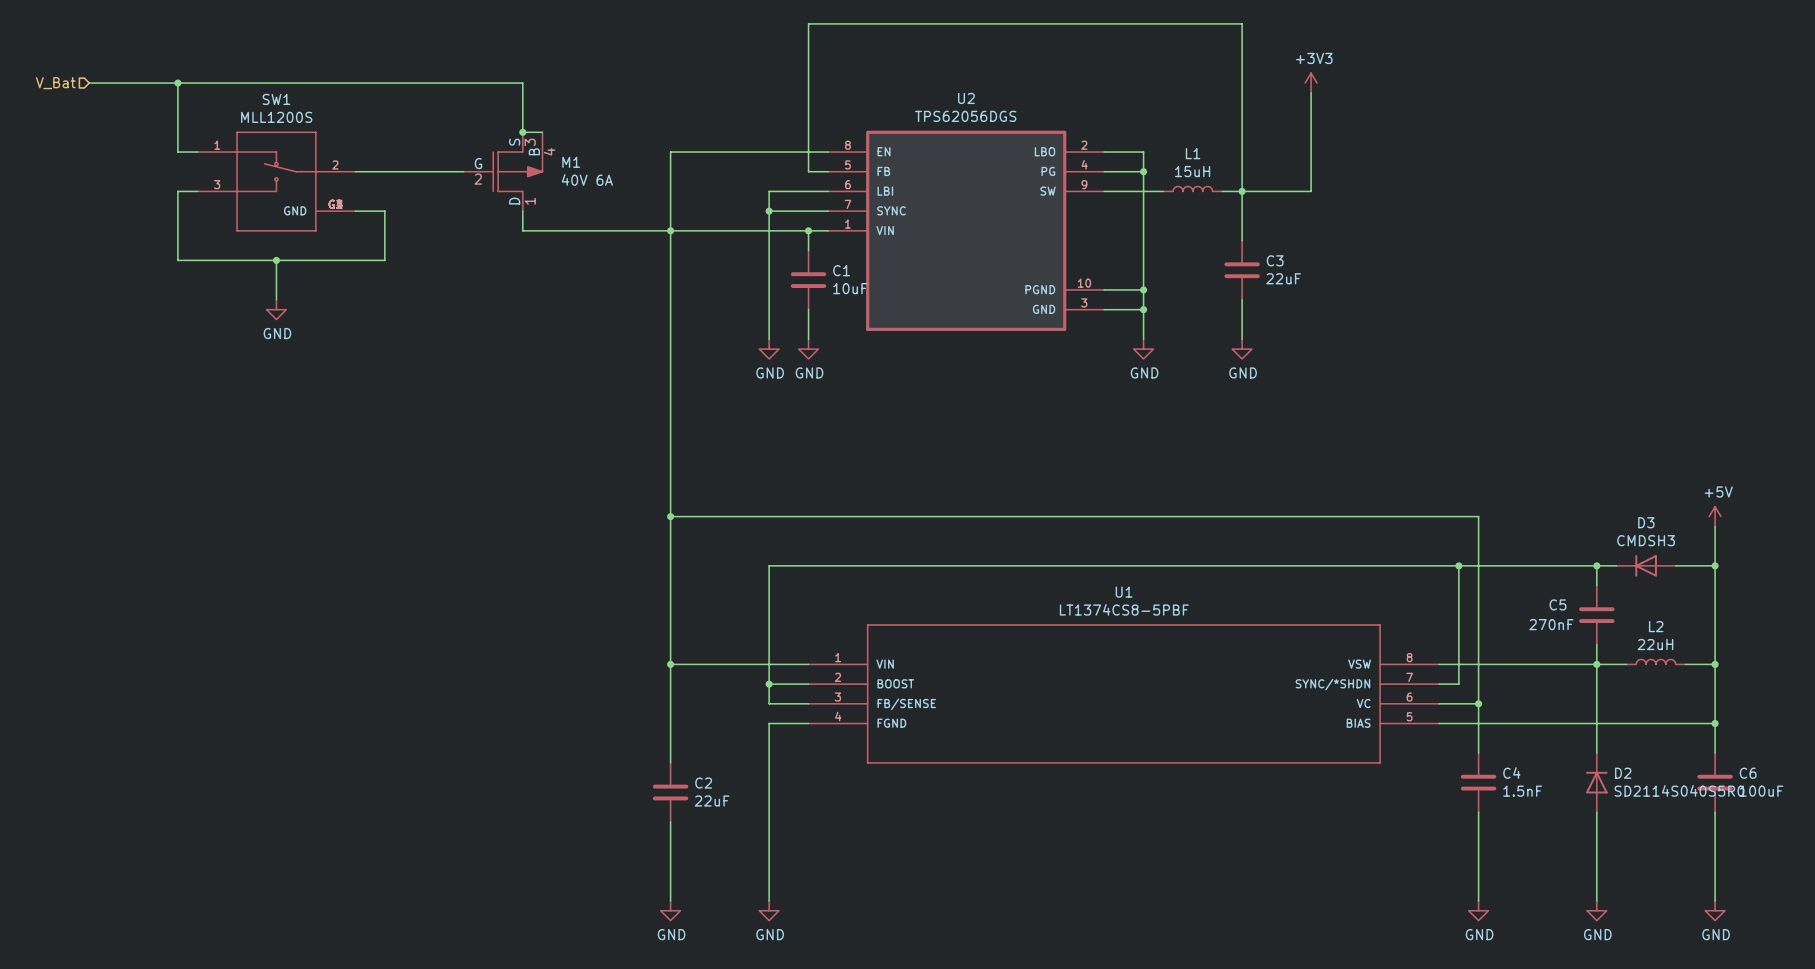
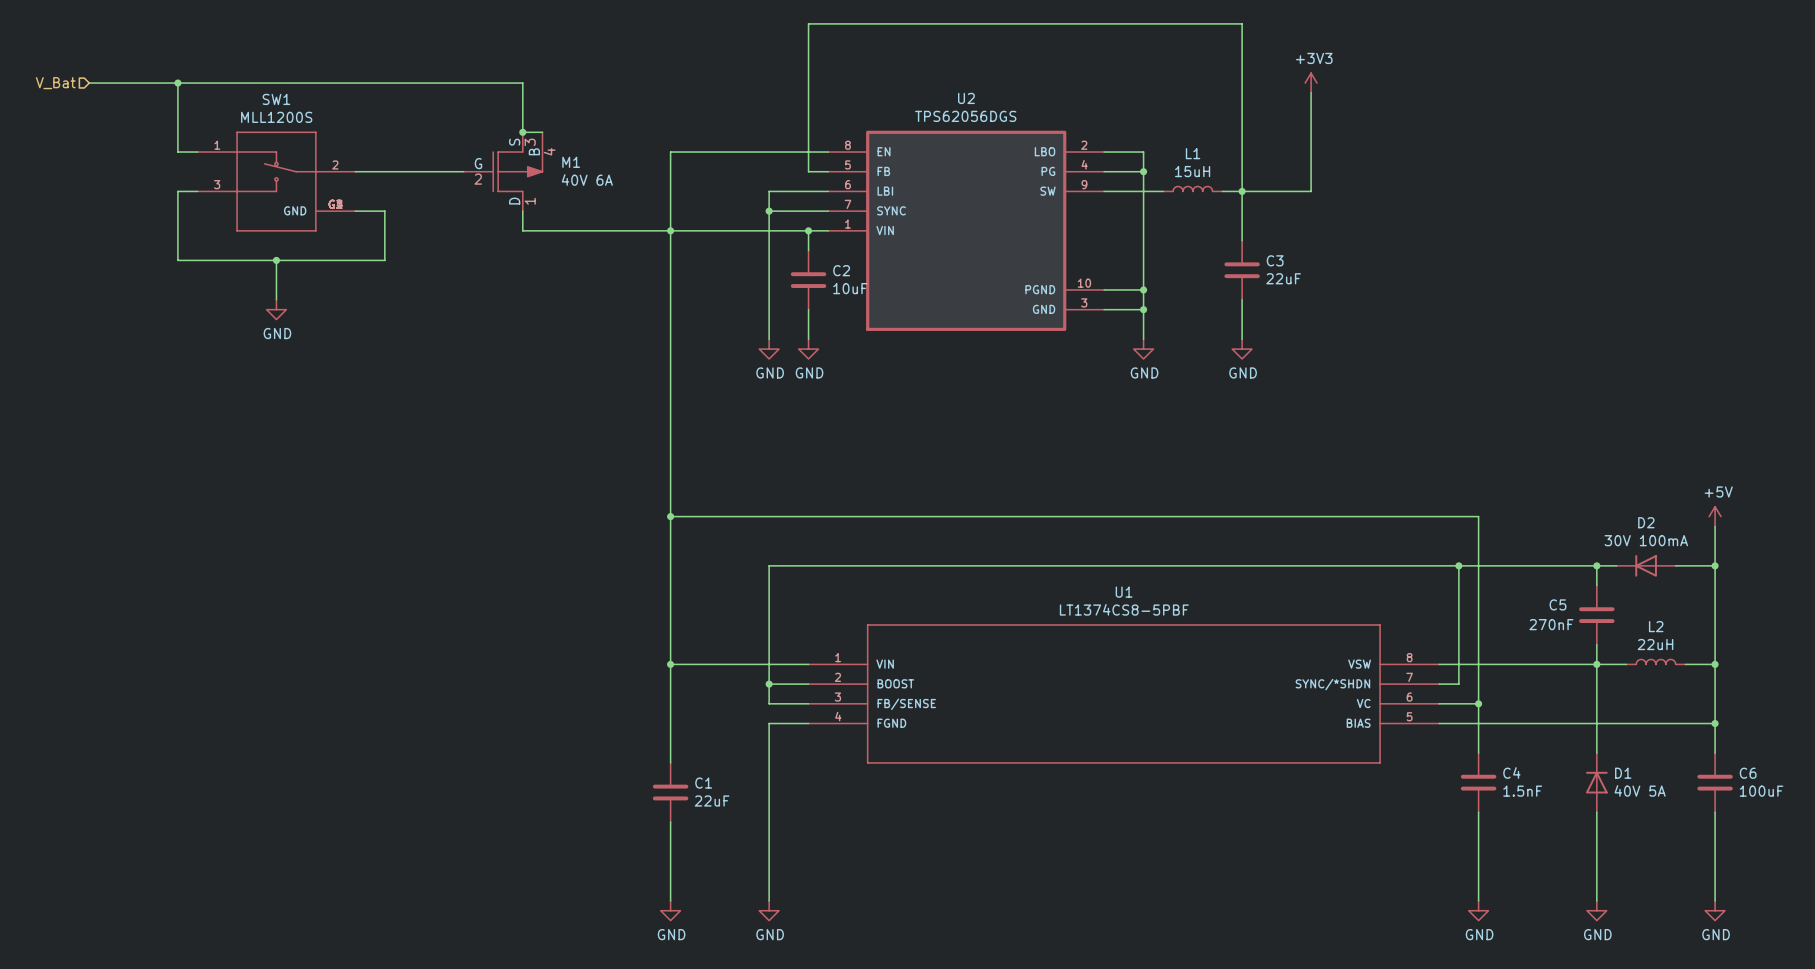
C1 name: C1 (841, 270) -> C2 (841, 270)
D3 name: D3 (1646, 522) -> D2 (1646, 522)
D3 value: CMDSH3 (1646, 540) -> 30V 100mA (1646, 540)
D2 name: D2 (1623, 773) -> D1 (1623, 773)
C2 name: C2 (703, 783) -> C1 (703, 783)
D2 value: SD2114S040S5R0 (1679, 790) -> 40V 5A (1640, 790)

